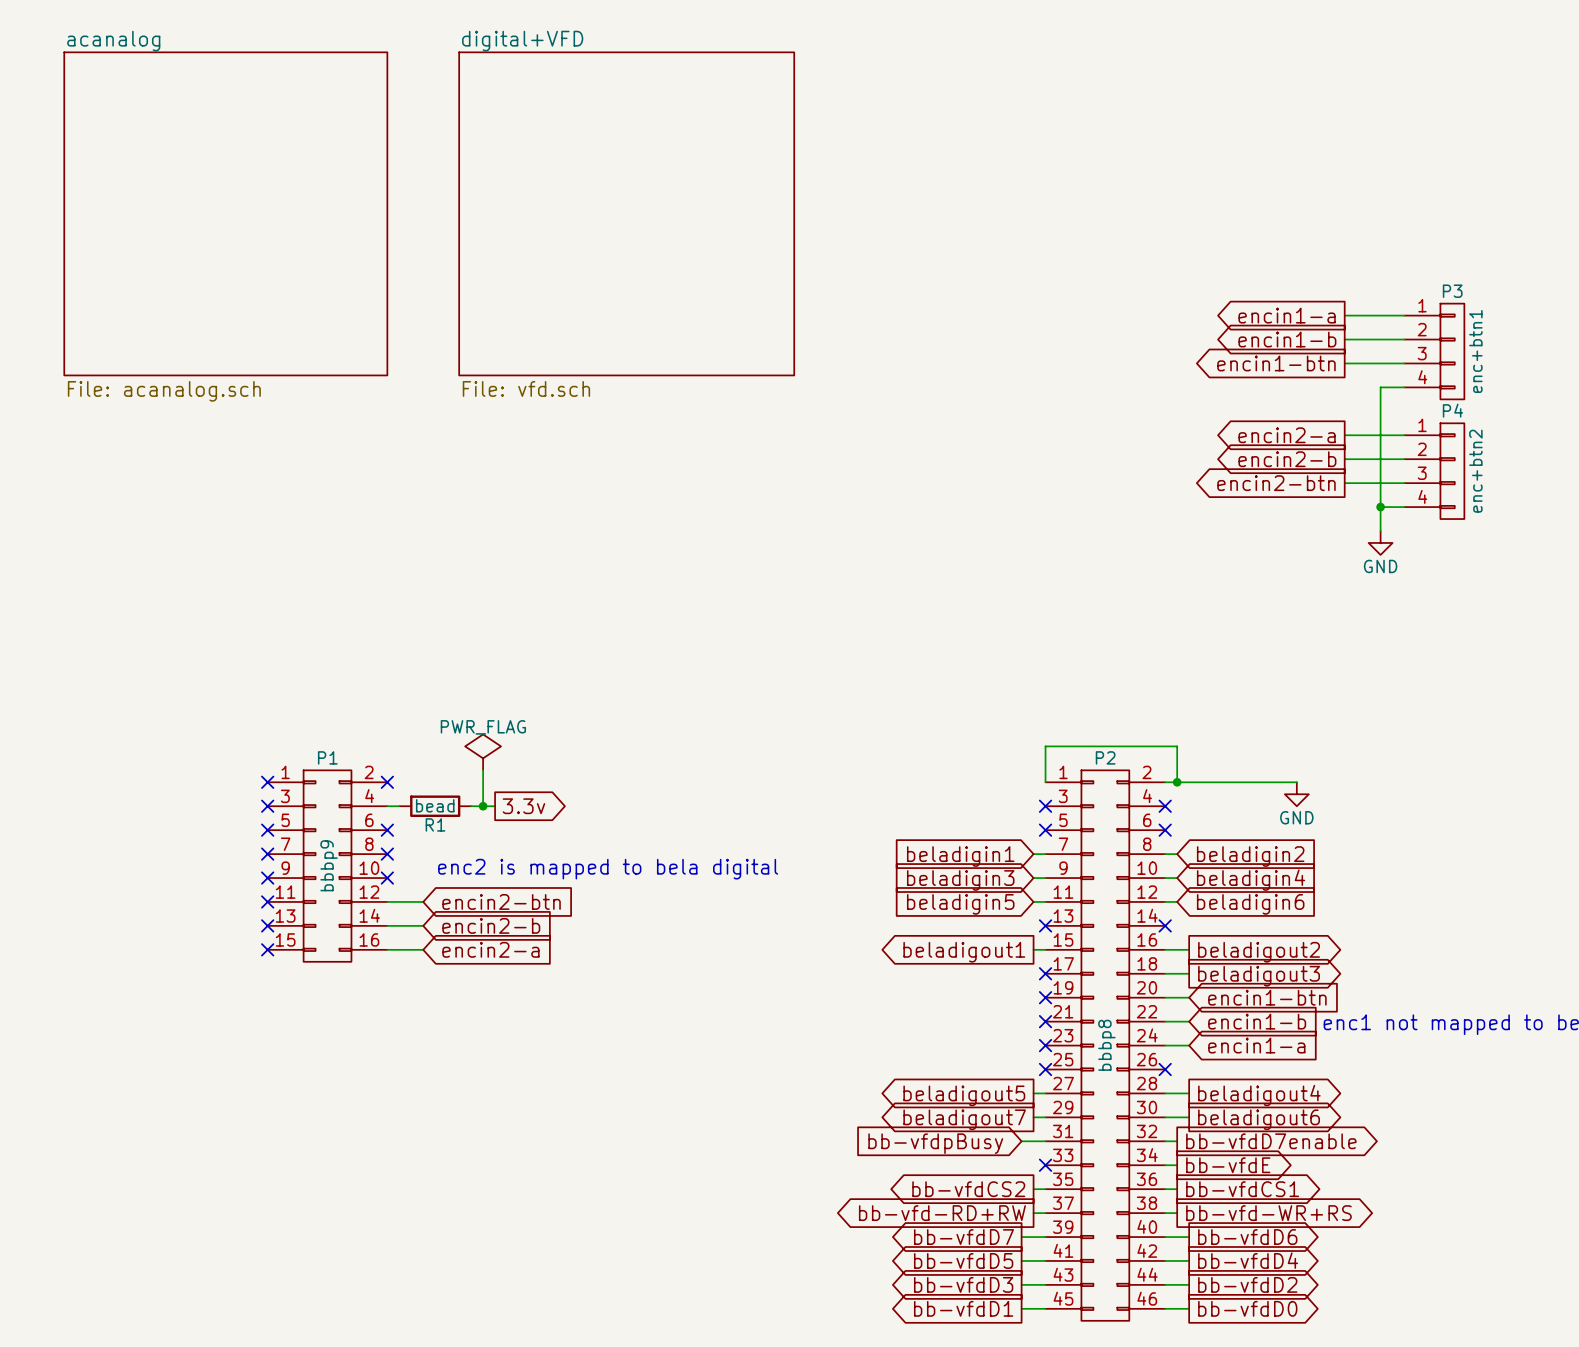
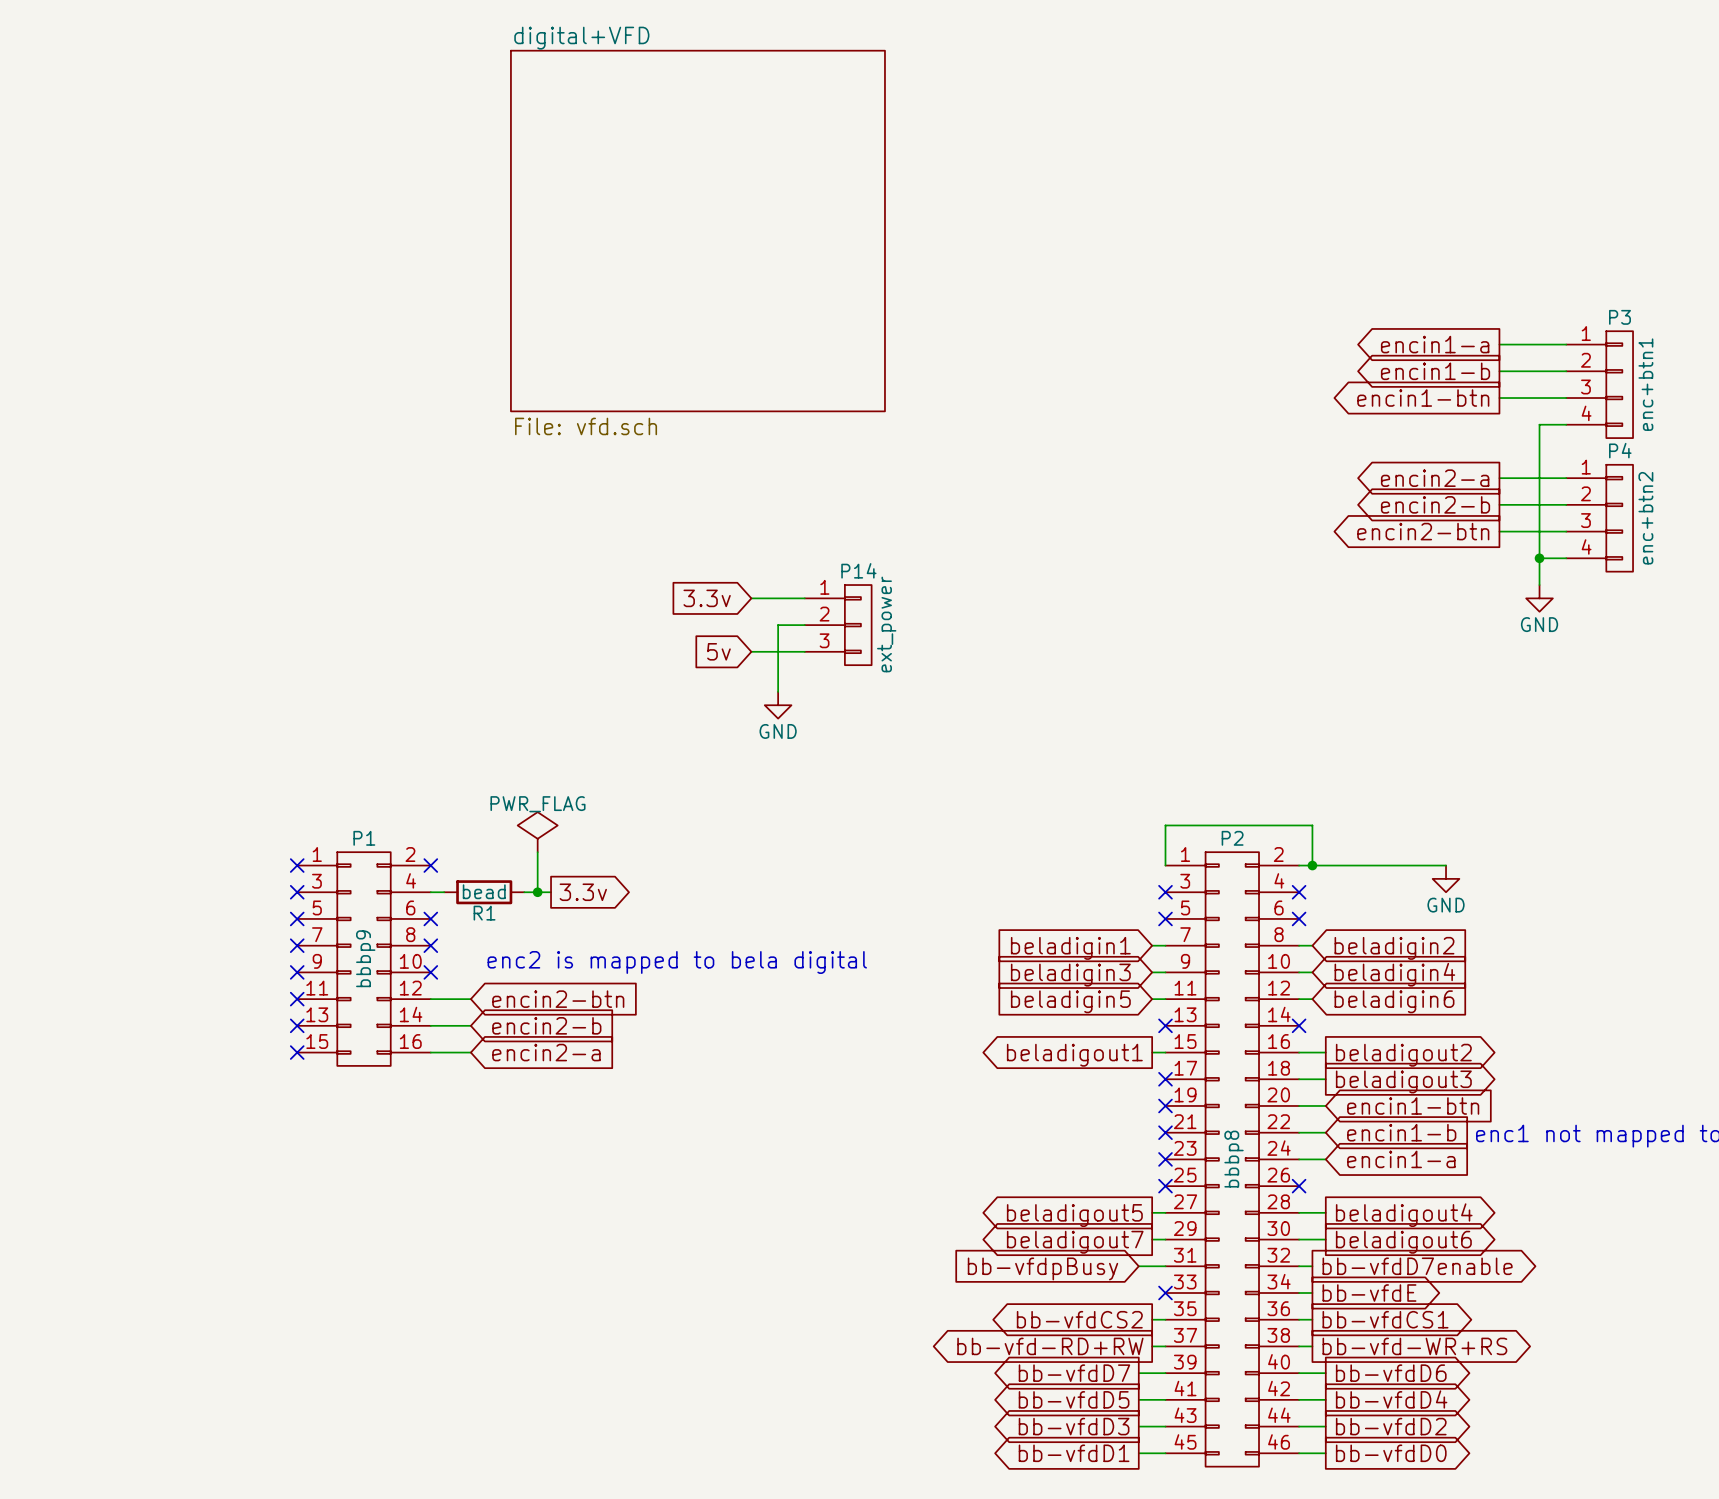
sheet acanalog: File: acanalog.sch (225, 213) -> none
global label: none -> 3.3v (707, 598)
wire: none -> (751, 598) (804, 598)
wire: none -> (804, 625) (778, 625) (778, 691)
P14: none -> ext_power (838, 625)
global label: none -> 5v (718, 651)
wire: none -> (751, 651) (804, 651)
power symbol: none -> GND (778, 705)

